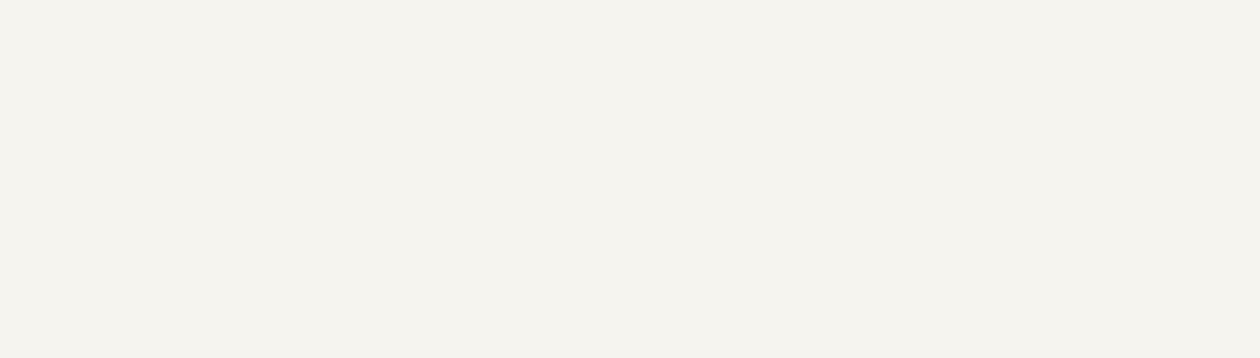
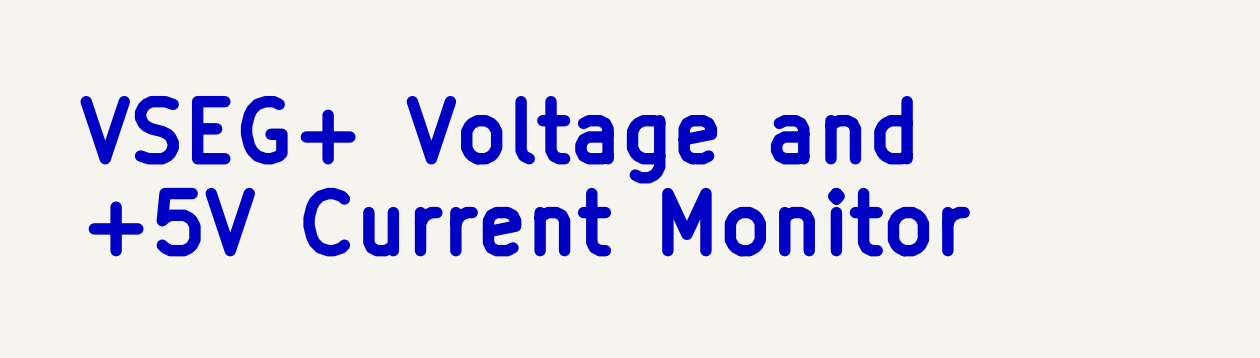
text: none -> VSEG+ Voltage and (496, 139)
text: none -> +5V Current Monitor (529, 222)

